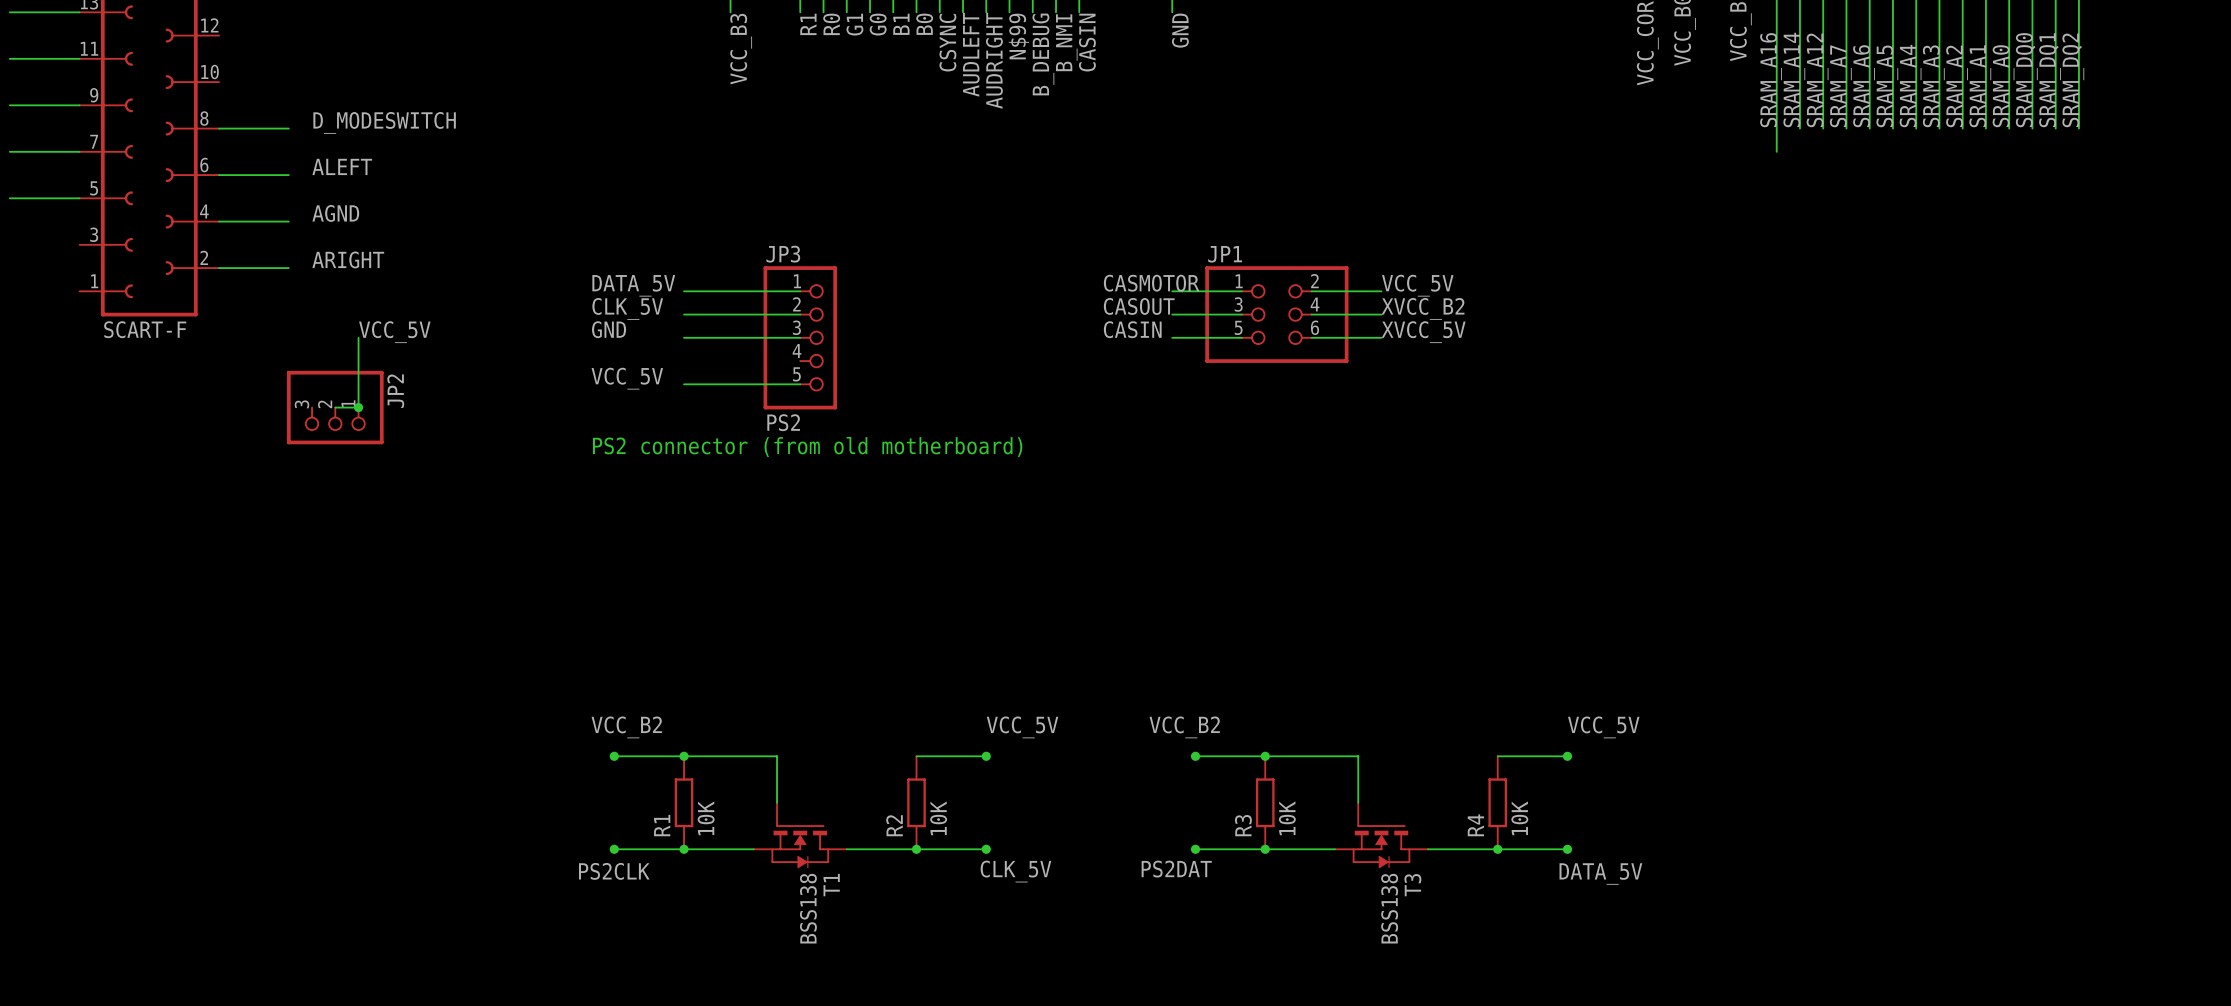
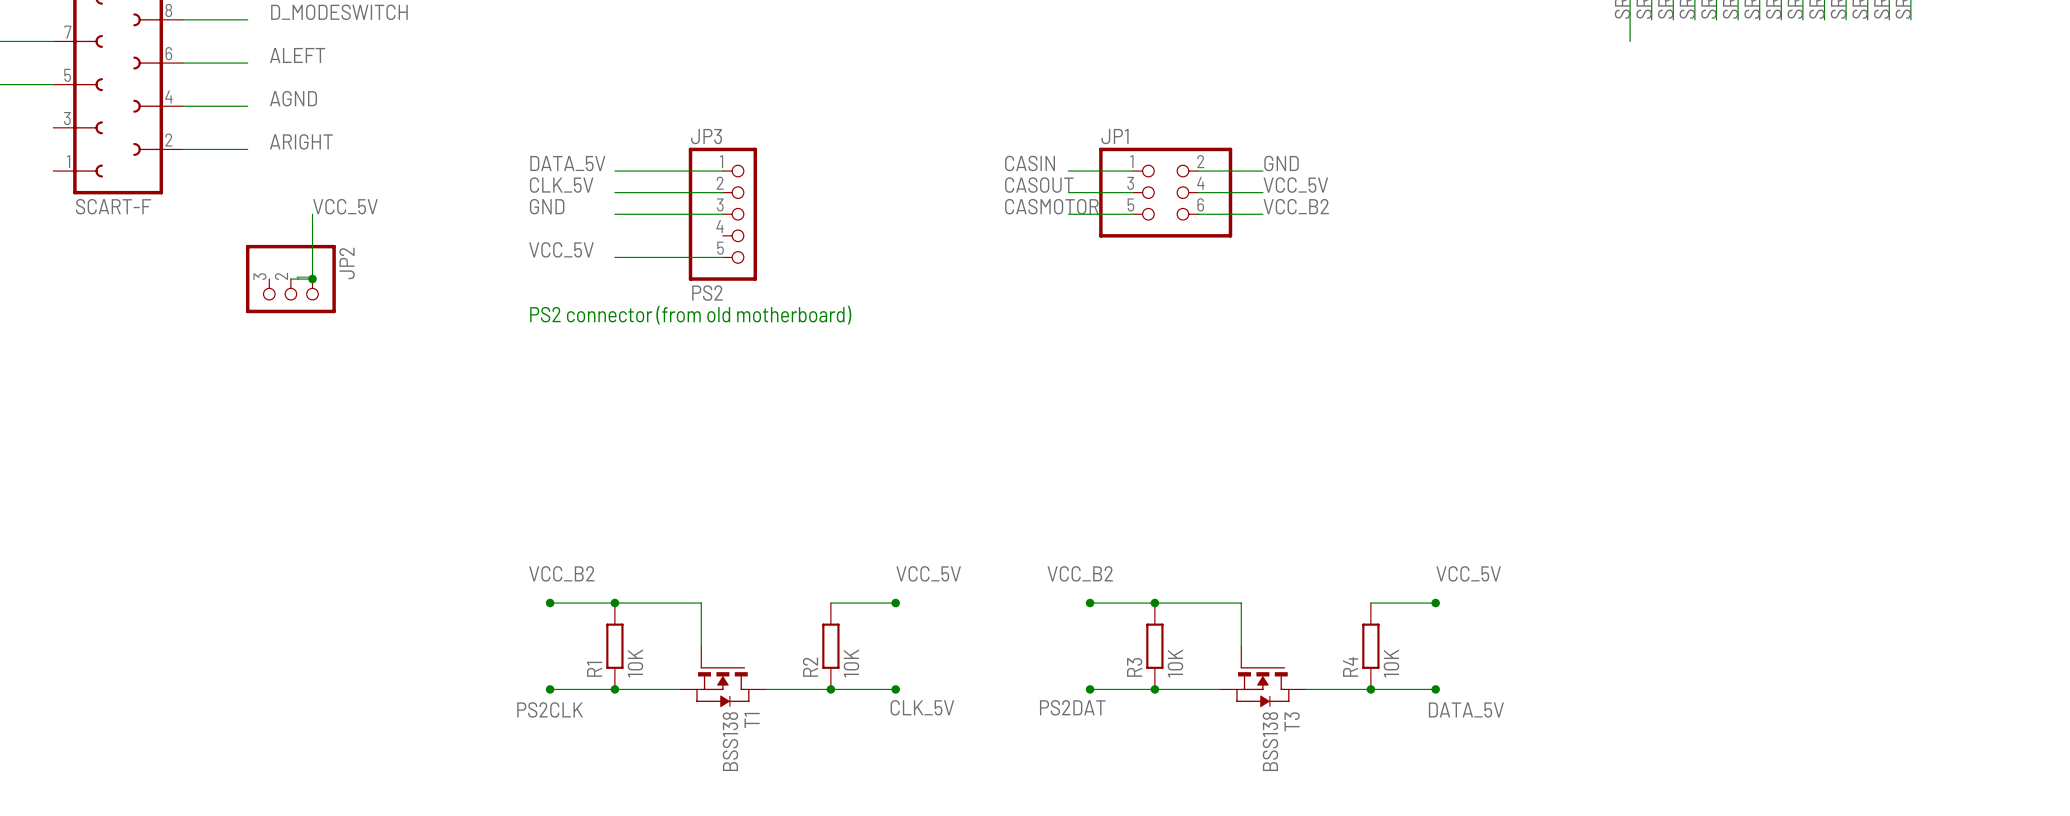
label: CASMOTOR (1151, 283) -> CASIN (1030, 163)
label: VCC_5V (1417, 285) -> GND (1281, 163)
label: XVCC_B2 (1423, 308) -> VCC_5V (1295, 185)
label: CASIN (1132, 329) -> CASMOTOR (1051, 206)
label: XVCC_5V (1423, 332) -> VCC_B2 (1296, 206)

